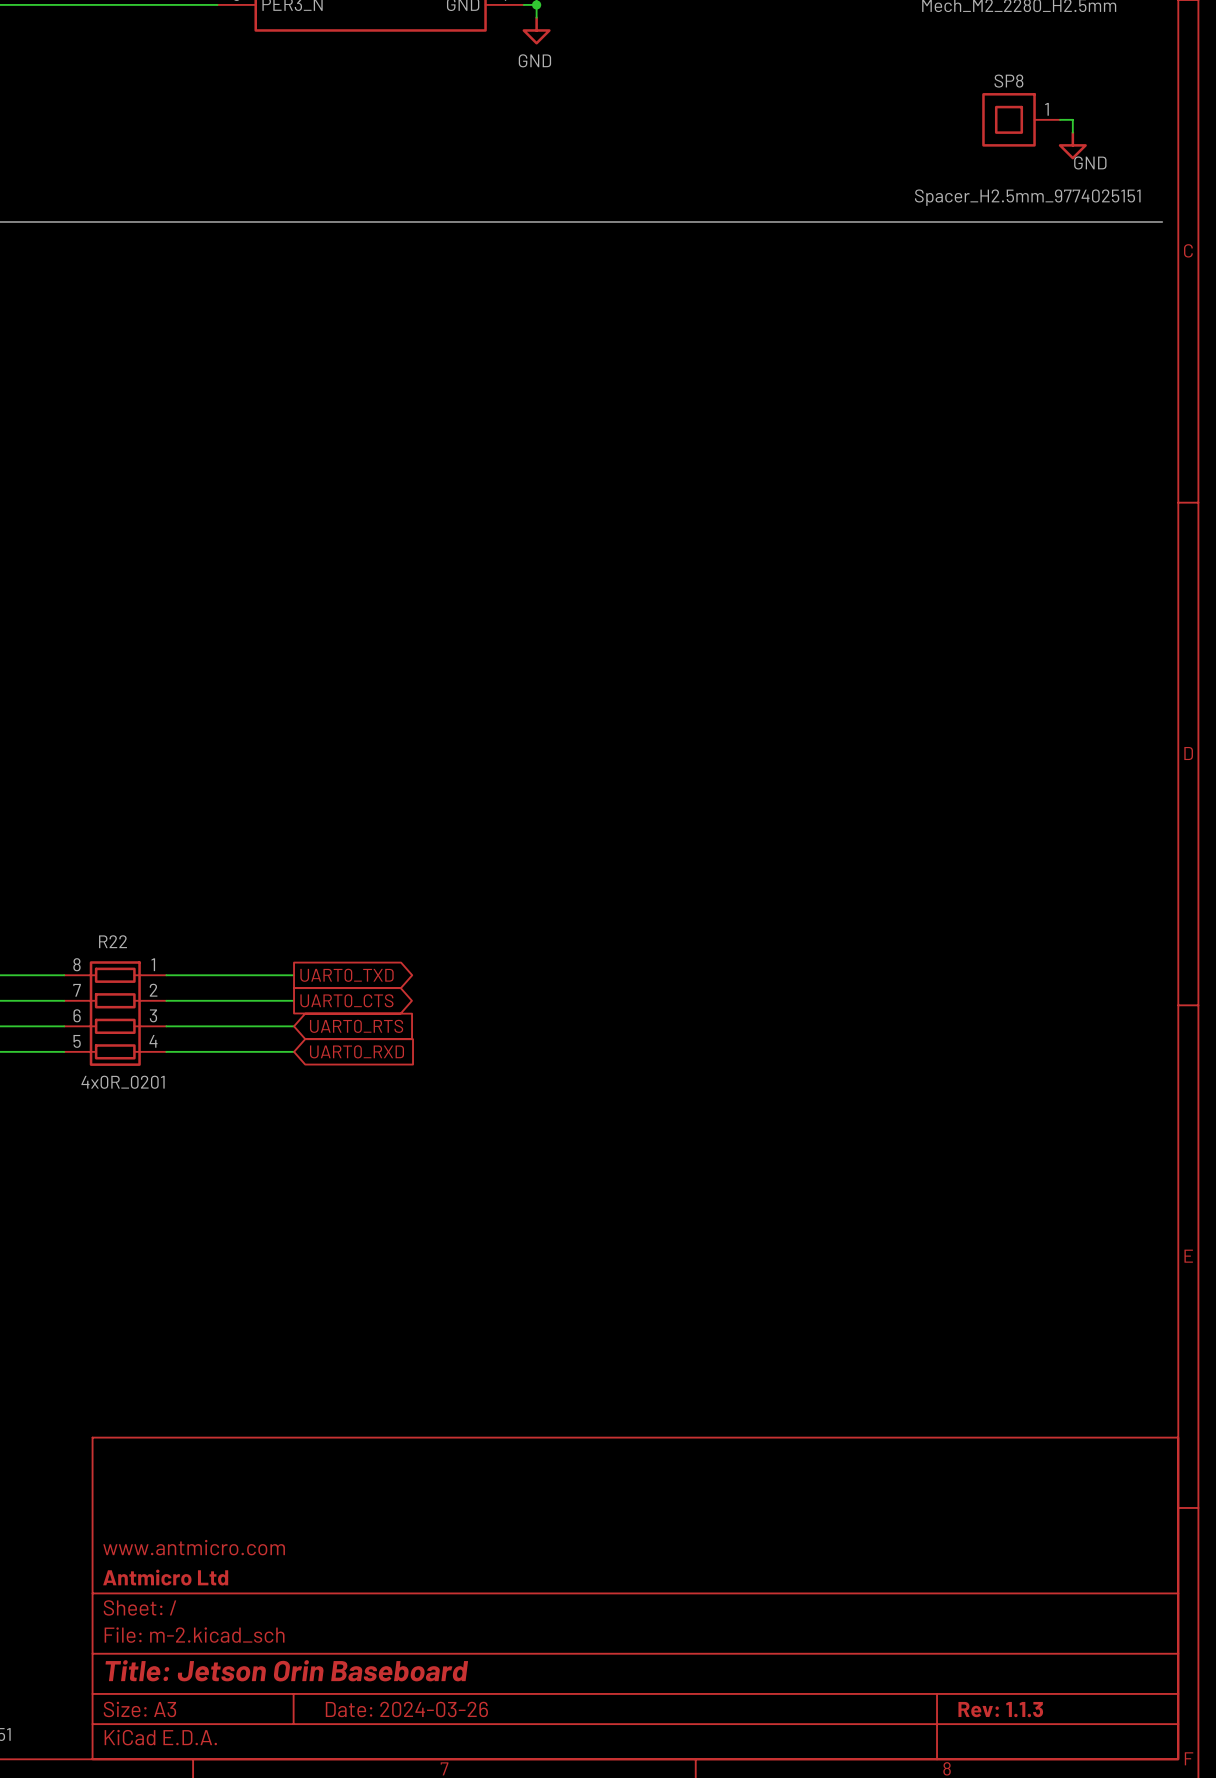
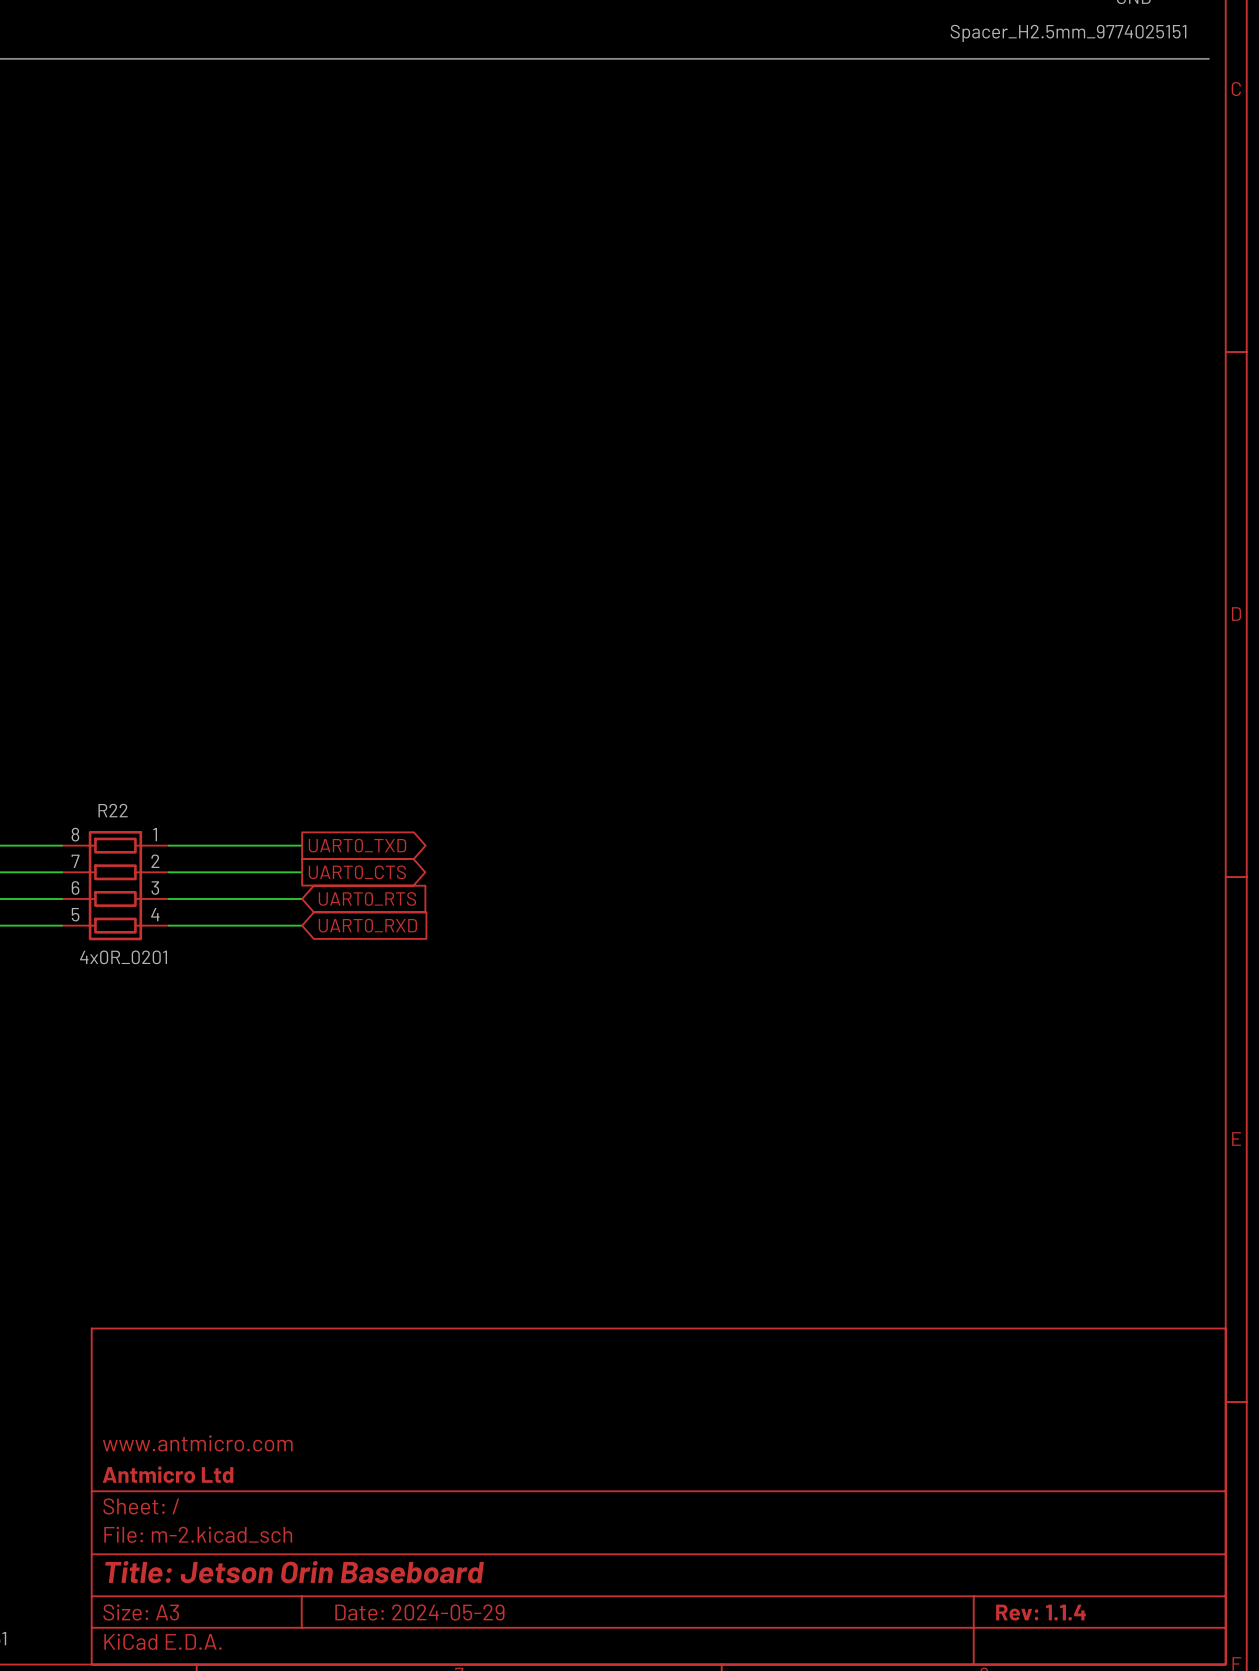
title block: Date: 2024-03-26 (406, 1709) -> Date: 2024-05-29 (419, 1612)
title block: Rev: 1.1.3 (1000, 1709) -> Rev: 1.1.4 (1040, 1612)

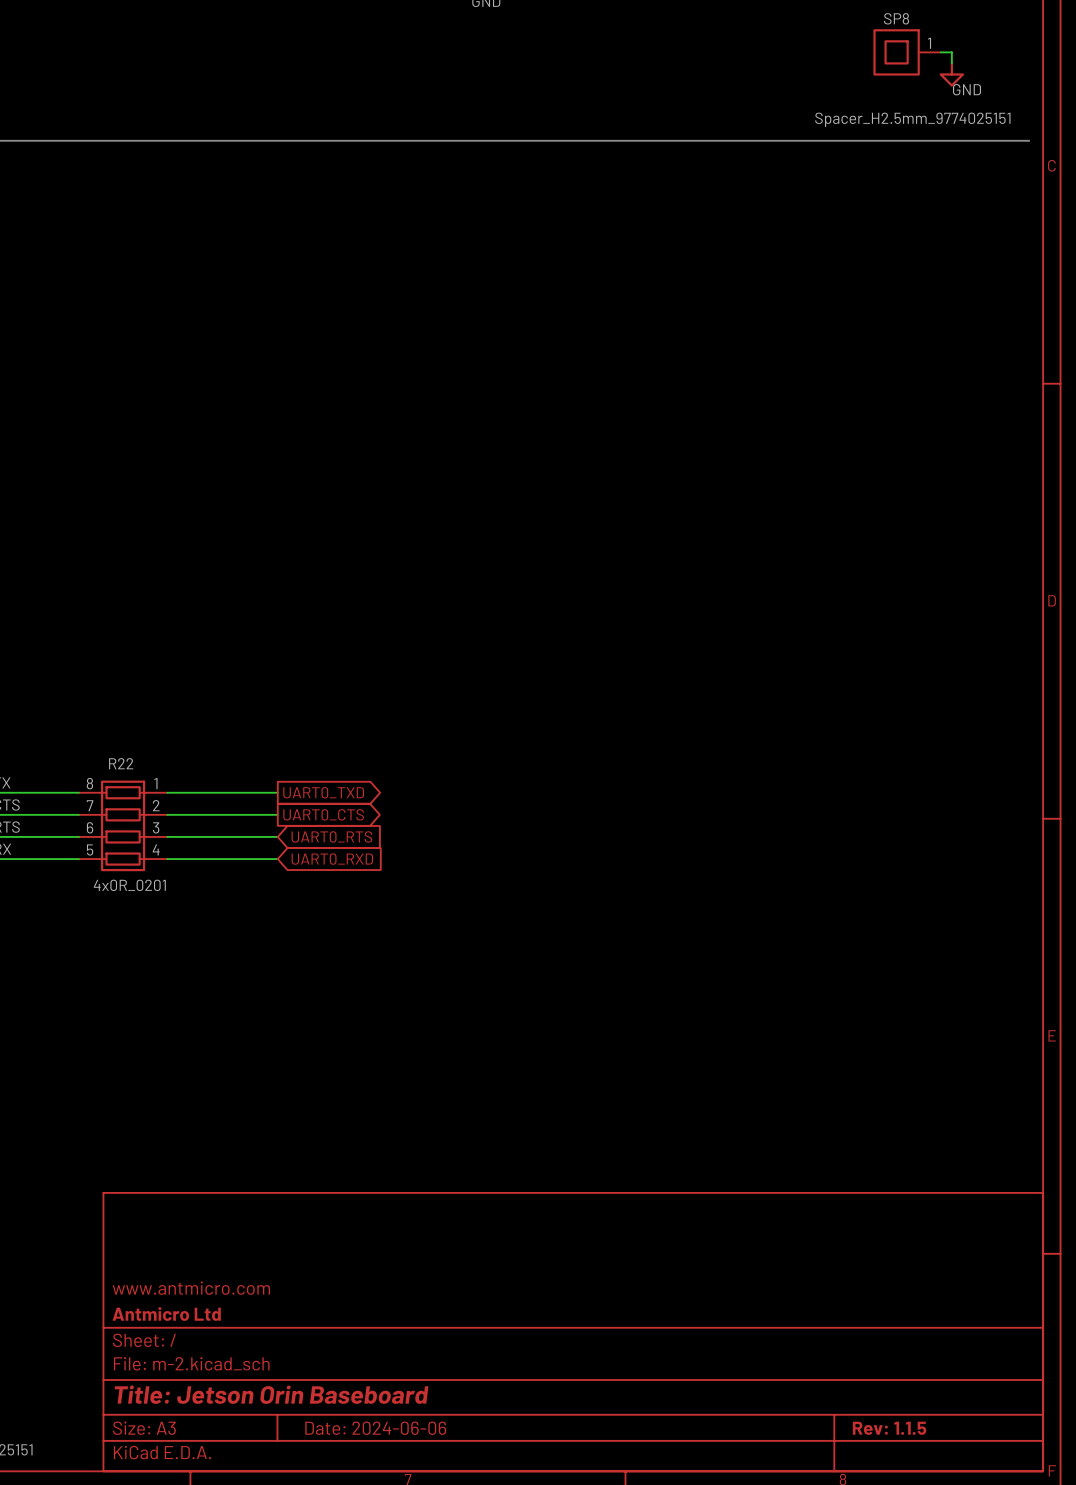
title block: Date: 2024-05-29 (419, 1612) -> Date: 2024-06-06 (375, 1428)
title block: Rev: 1.1.4 (1040, 1612) -> Rev: 1.1.5 (889, 1428)

